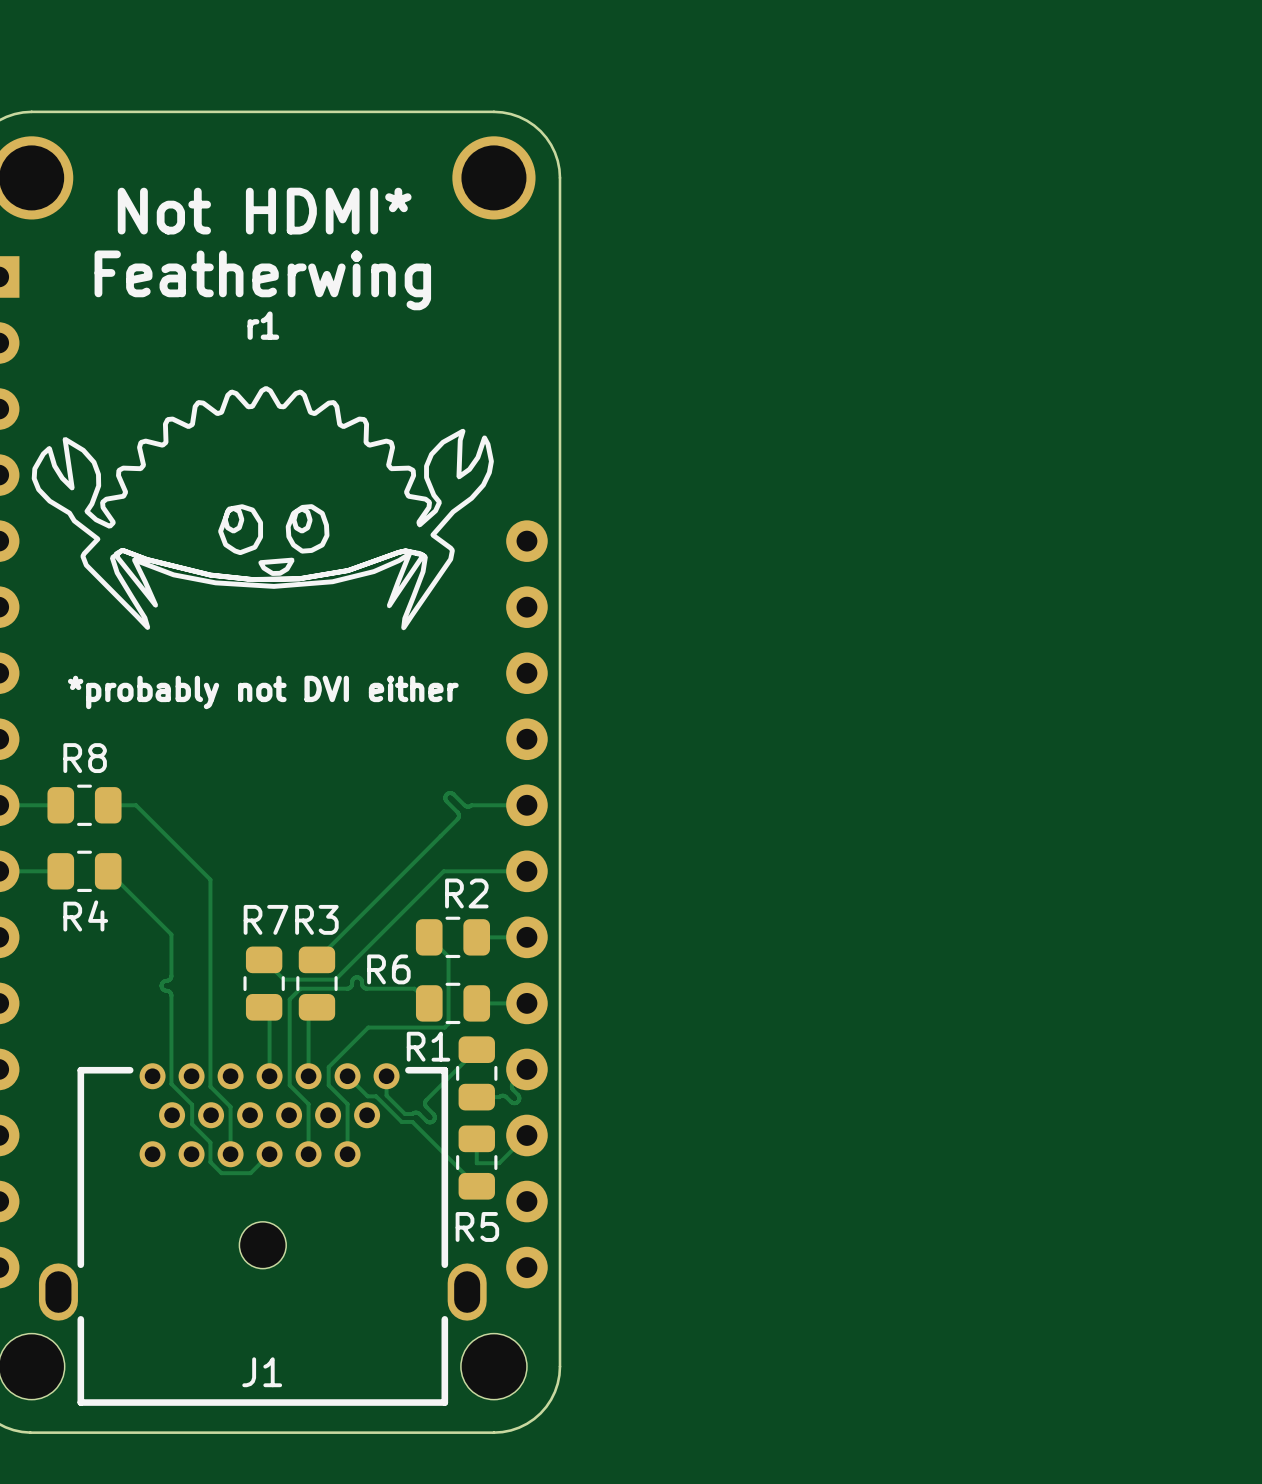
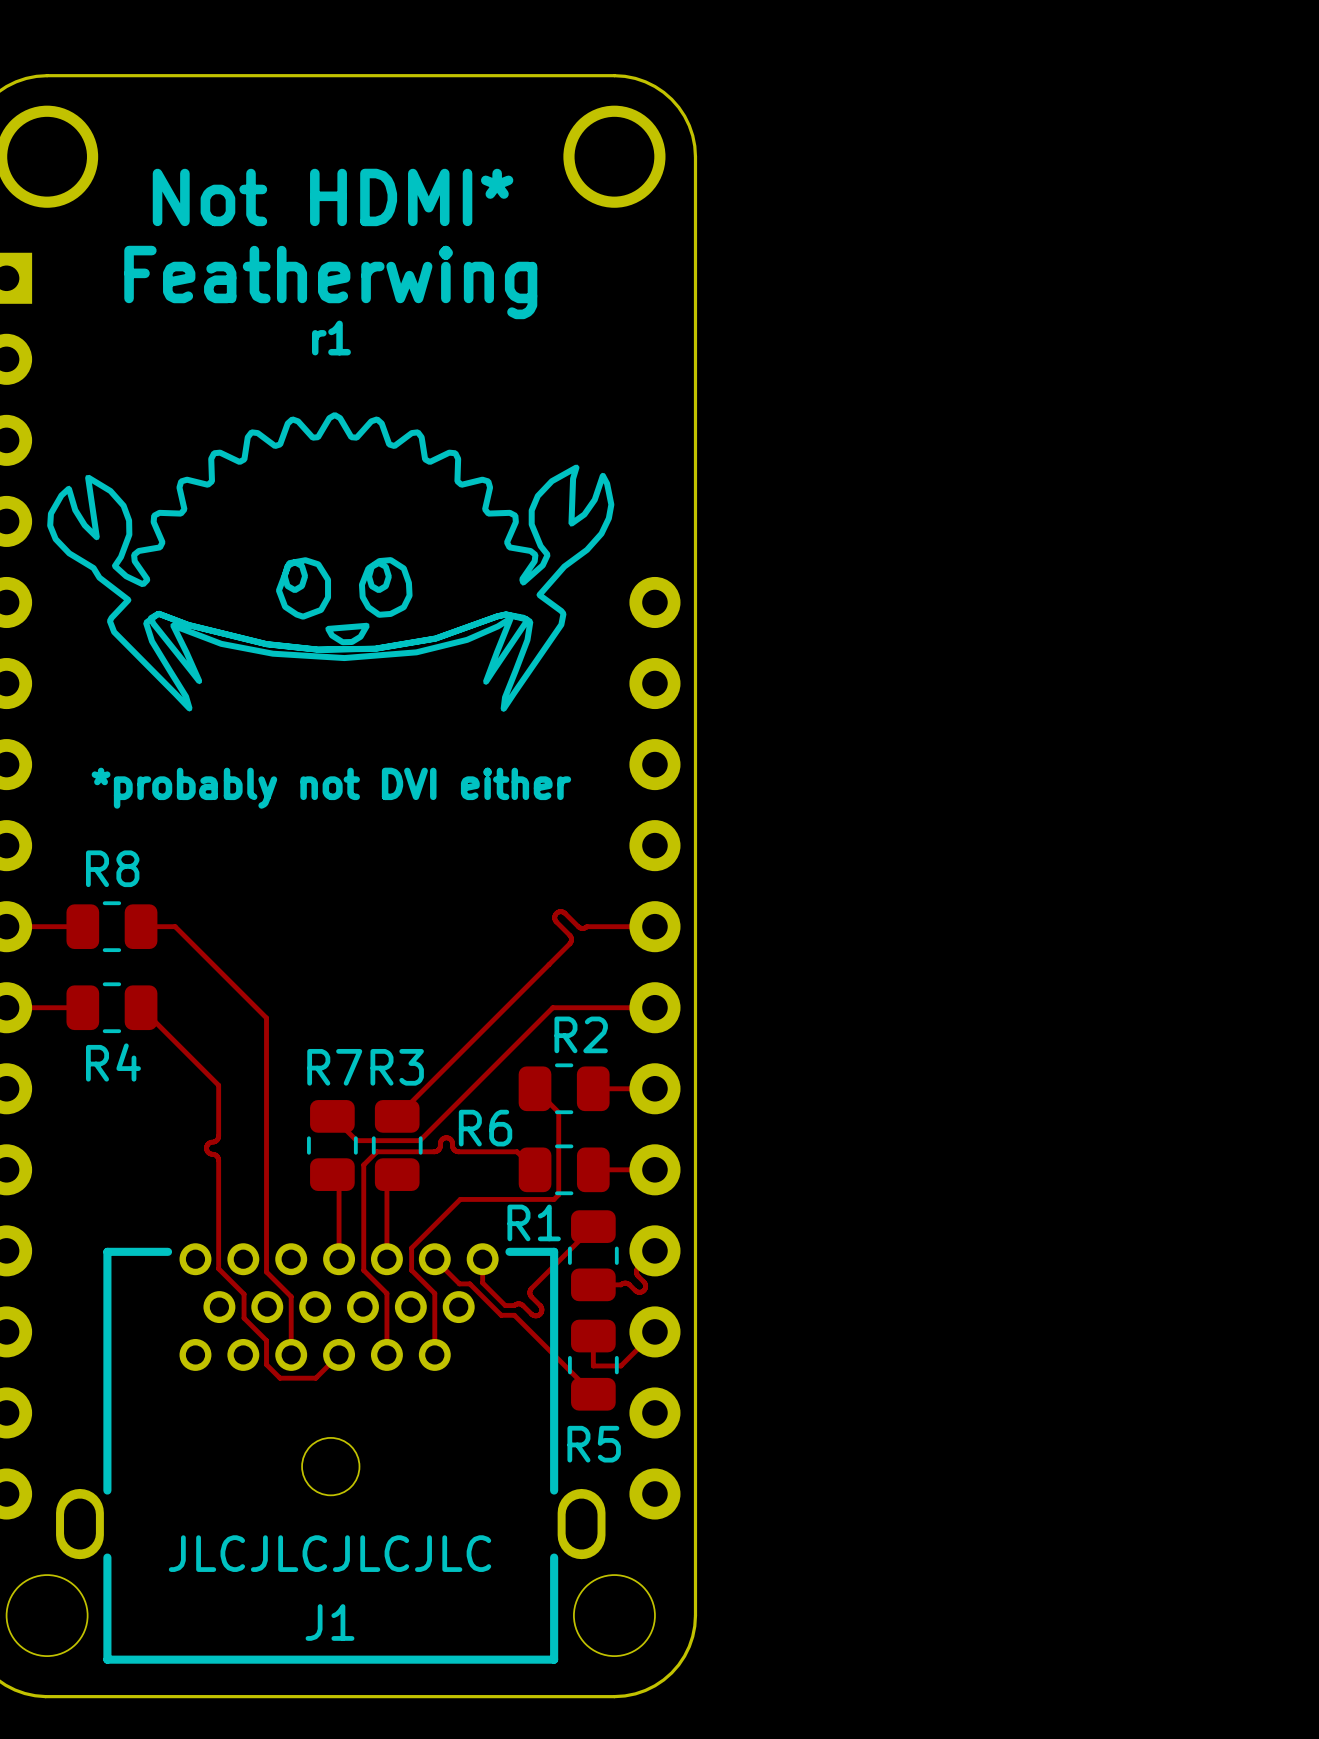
text: none -> JLCJLCJLCJLC (330, 1553)

